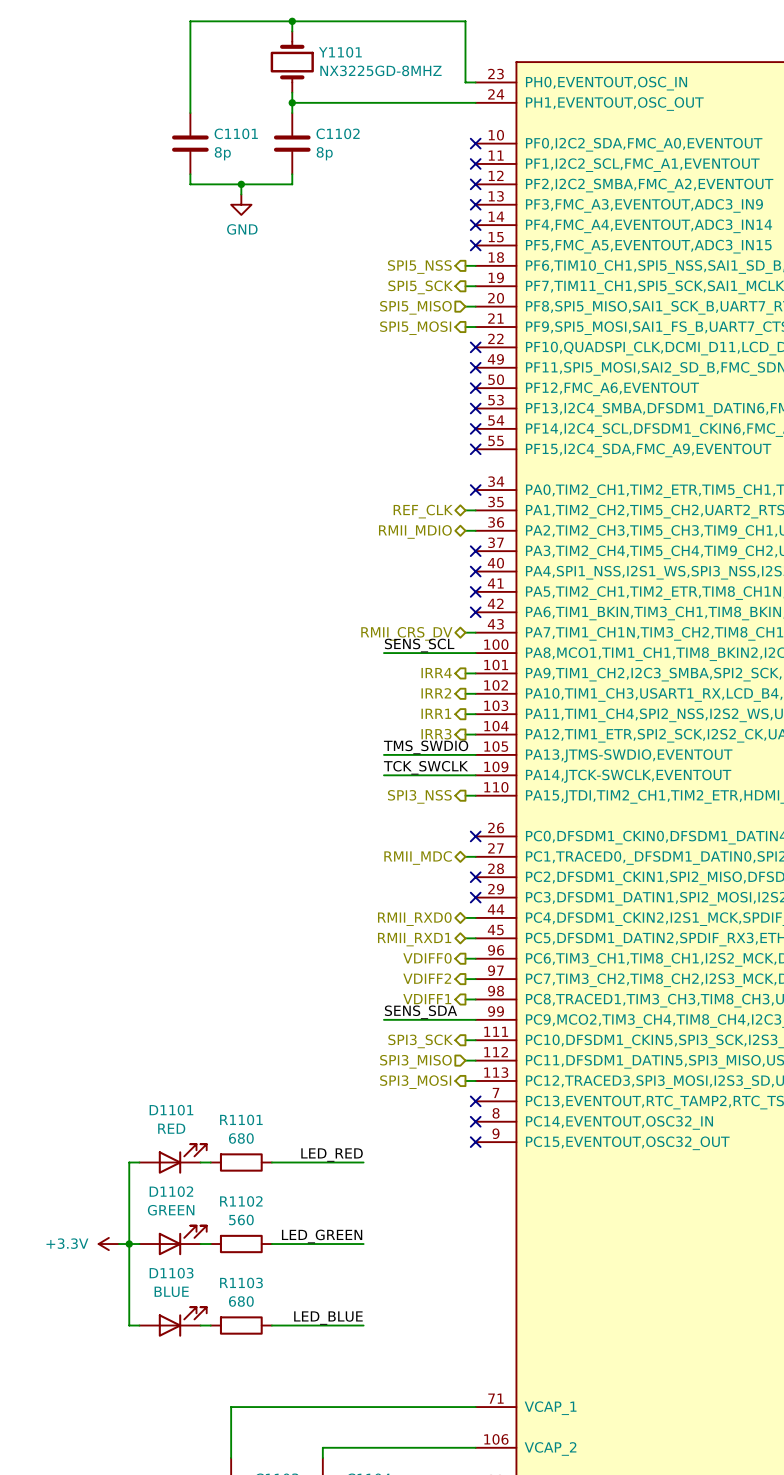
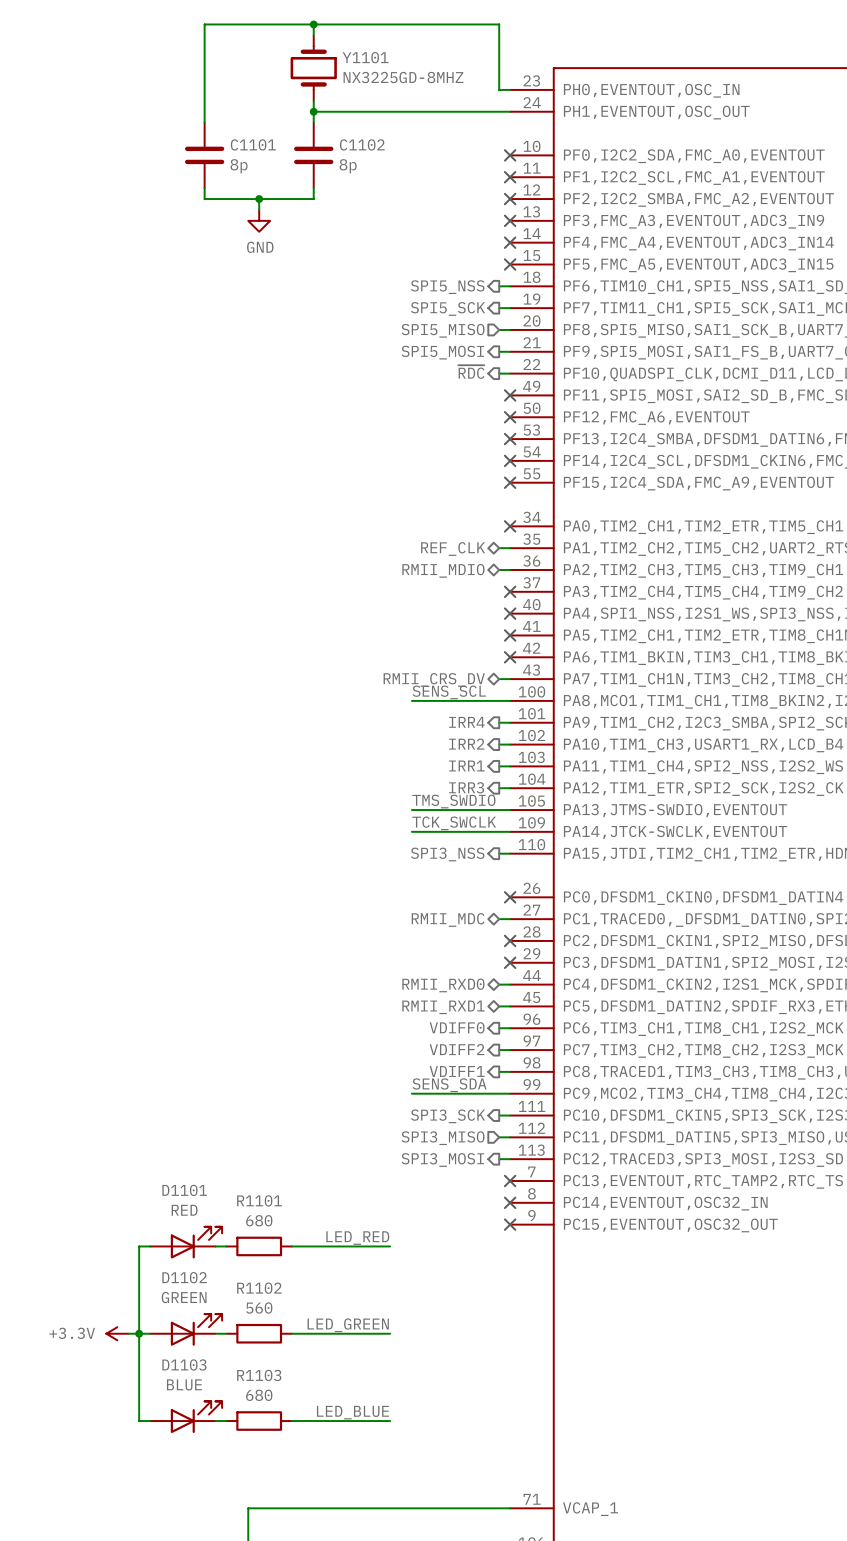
hierarchical label: none -> ~{RDC} (471, 372)
wire: none -> (499, 373) (510, 373)
no-connect mark: (475, 347) -> none

